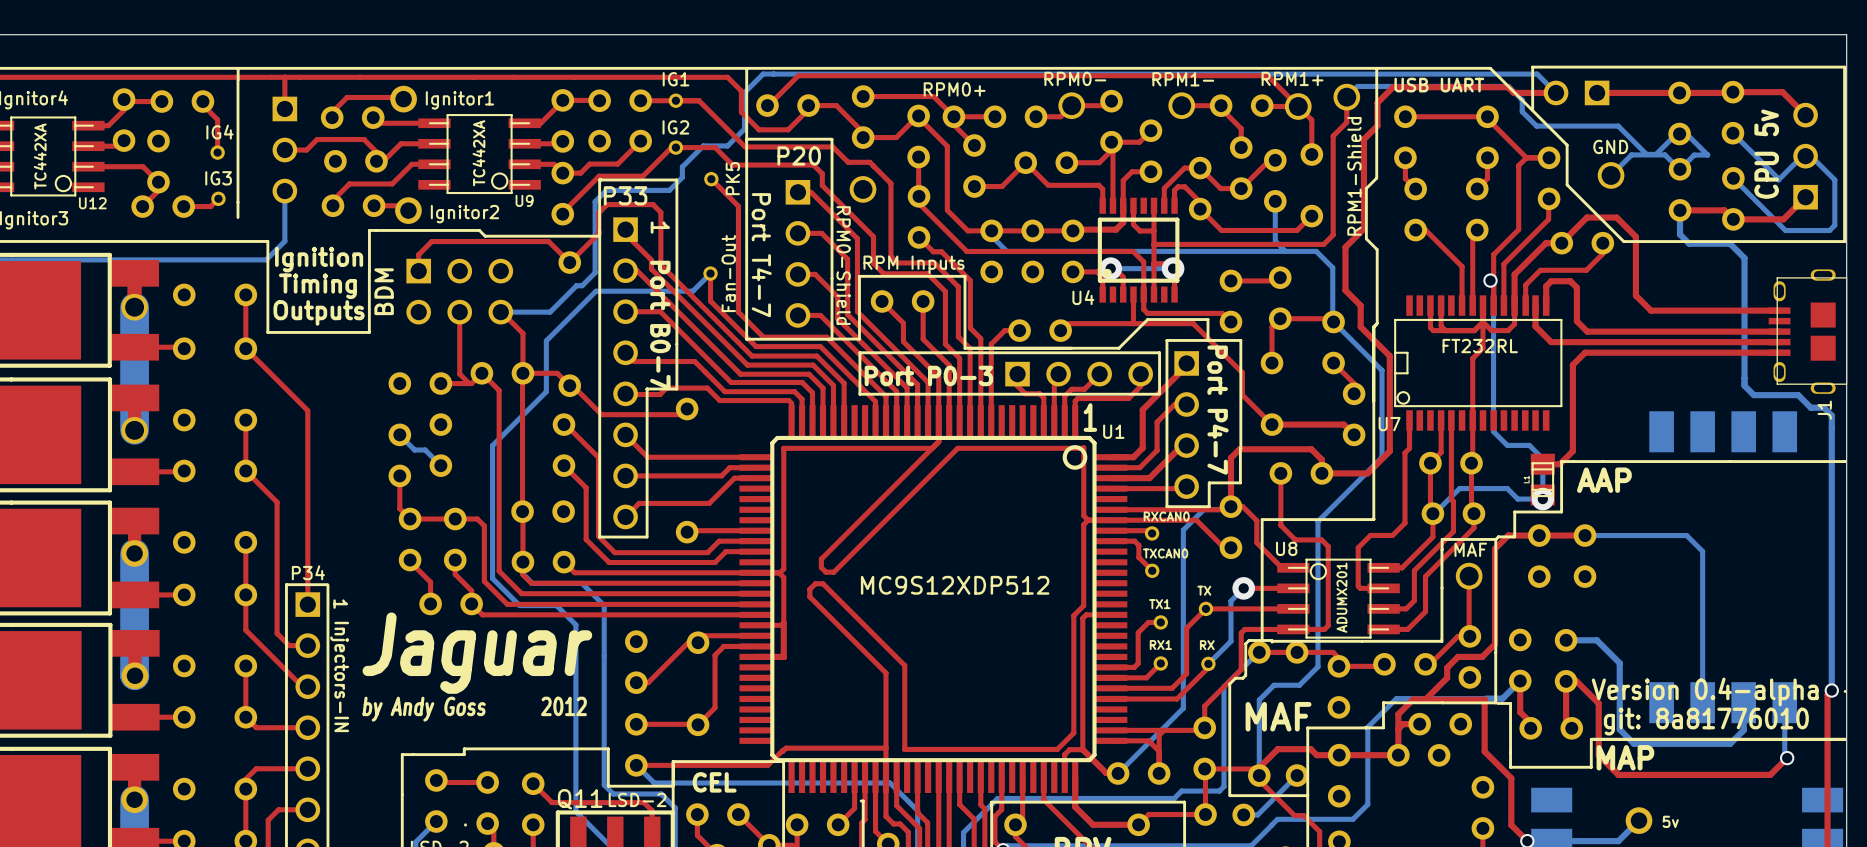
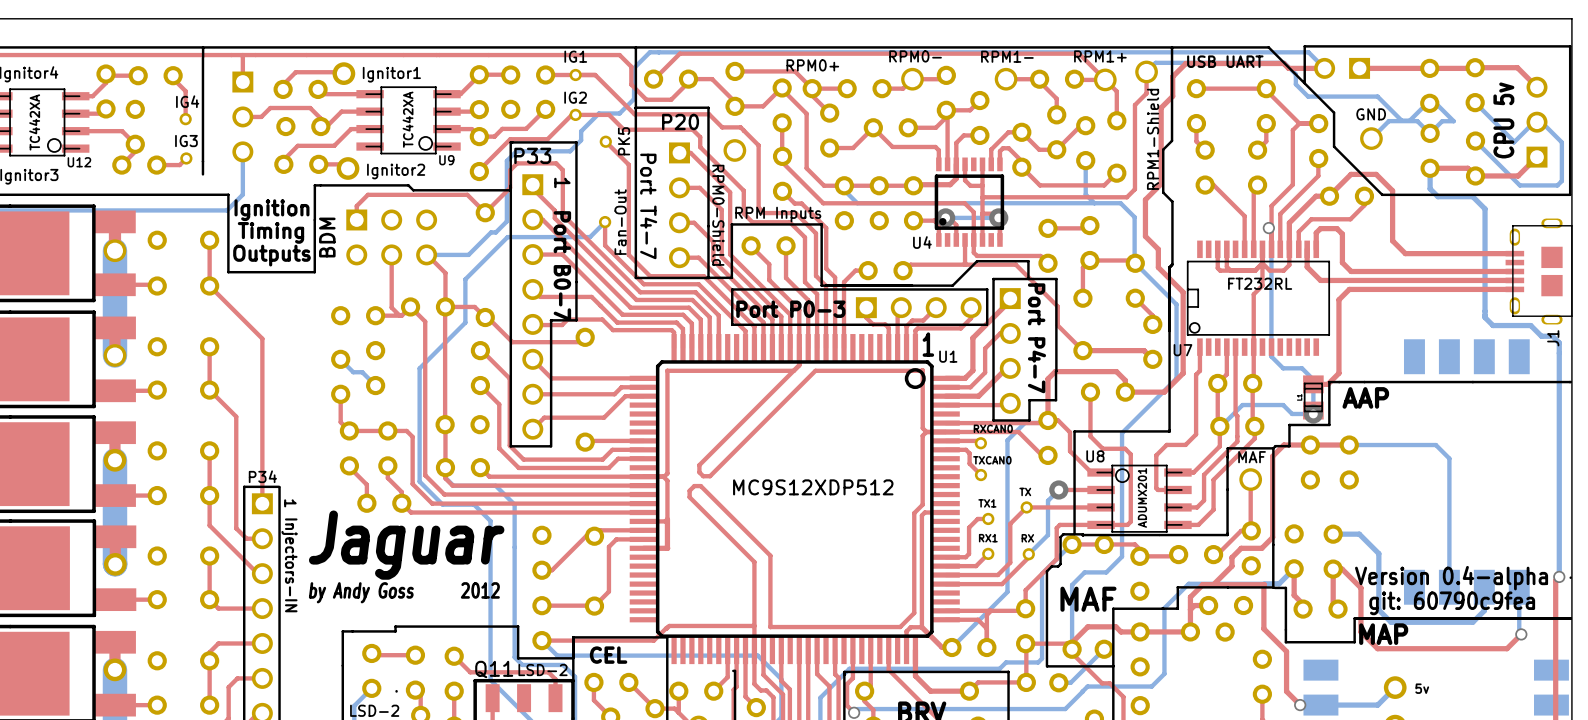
text: git: 8a81776010 (1706, 721) -> git: 60790c9fea (1452, 603)

